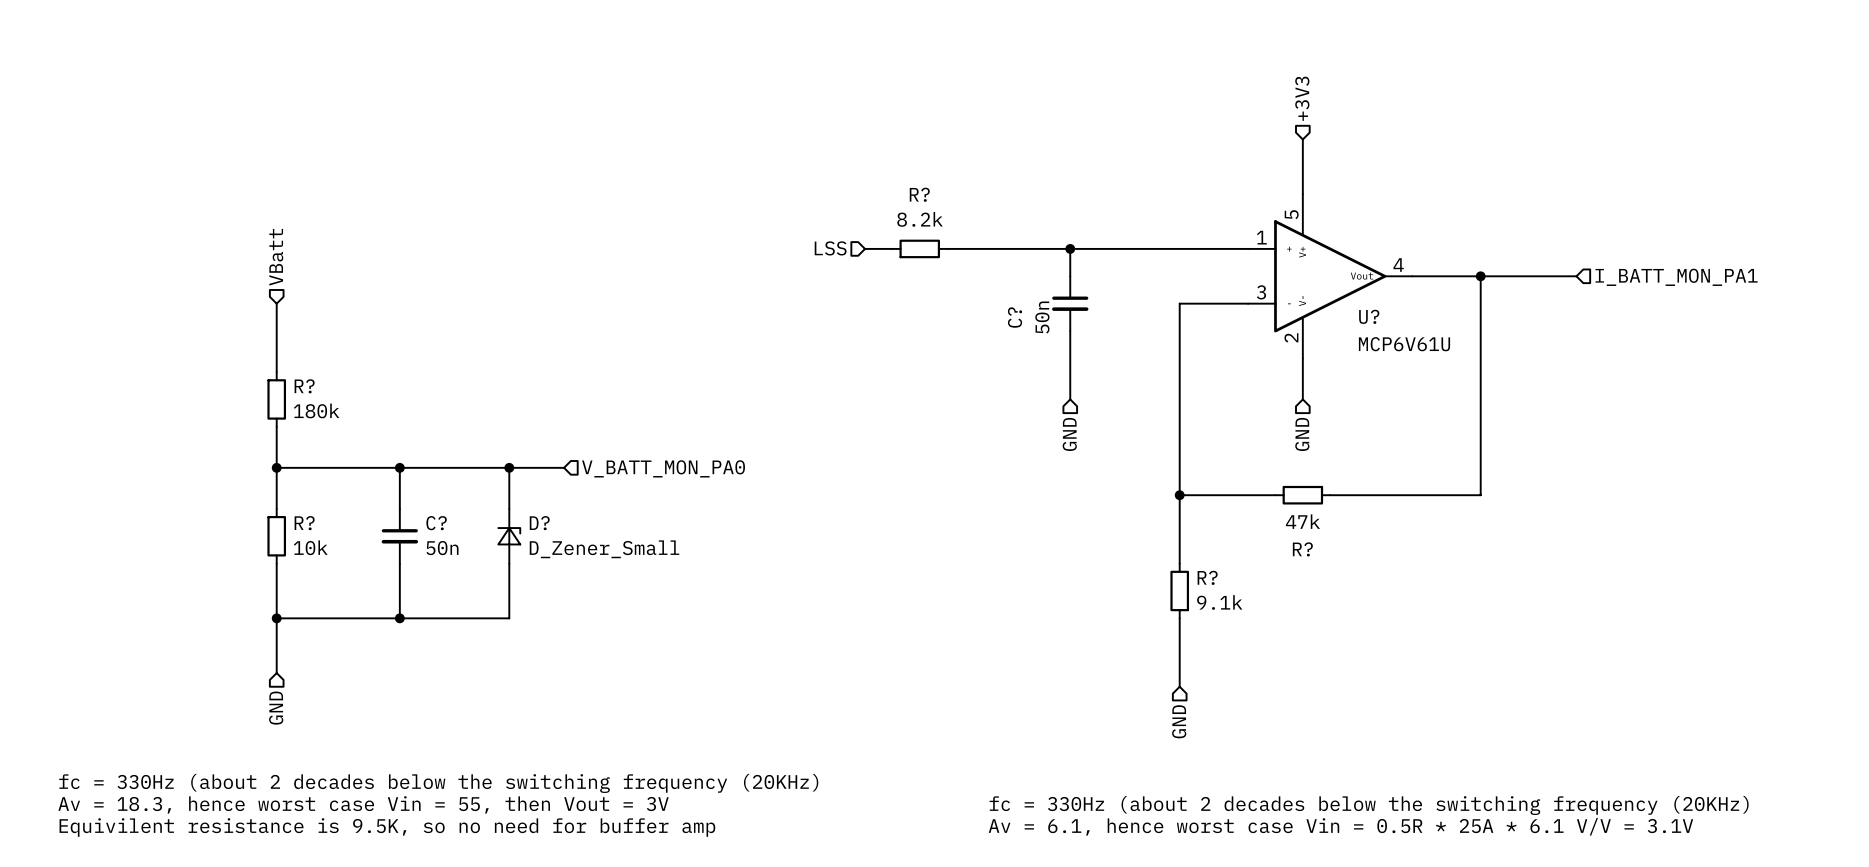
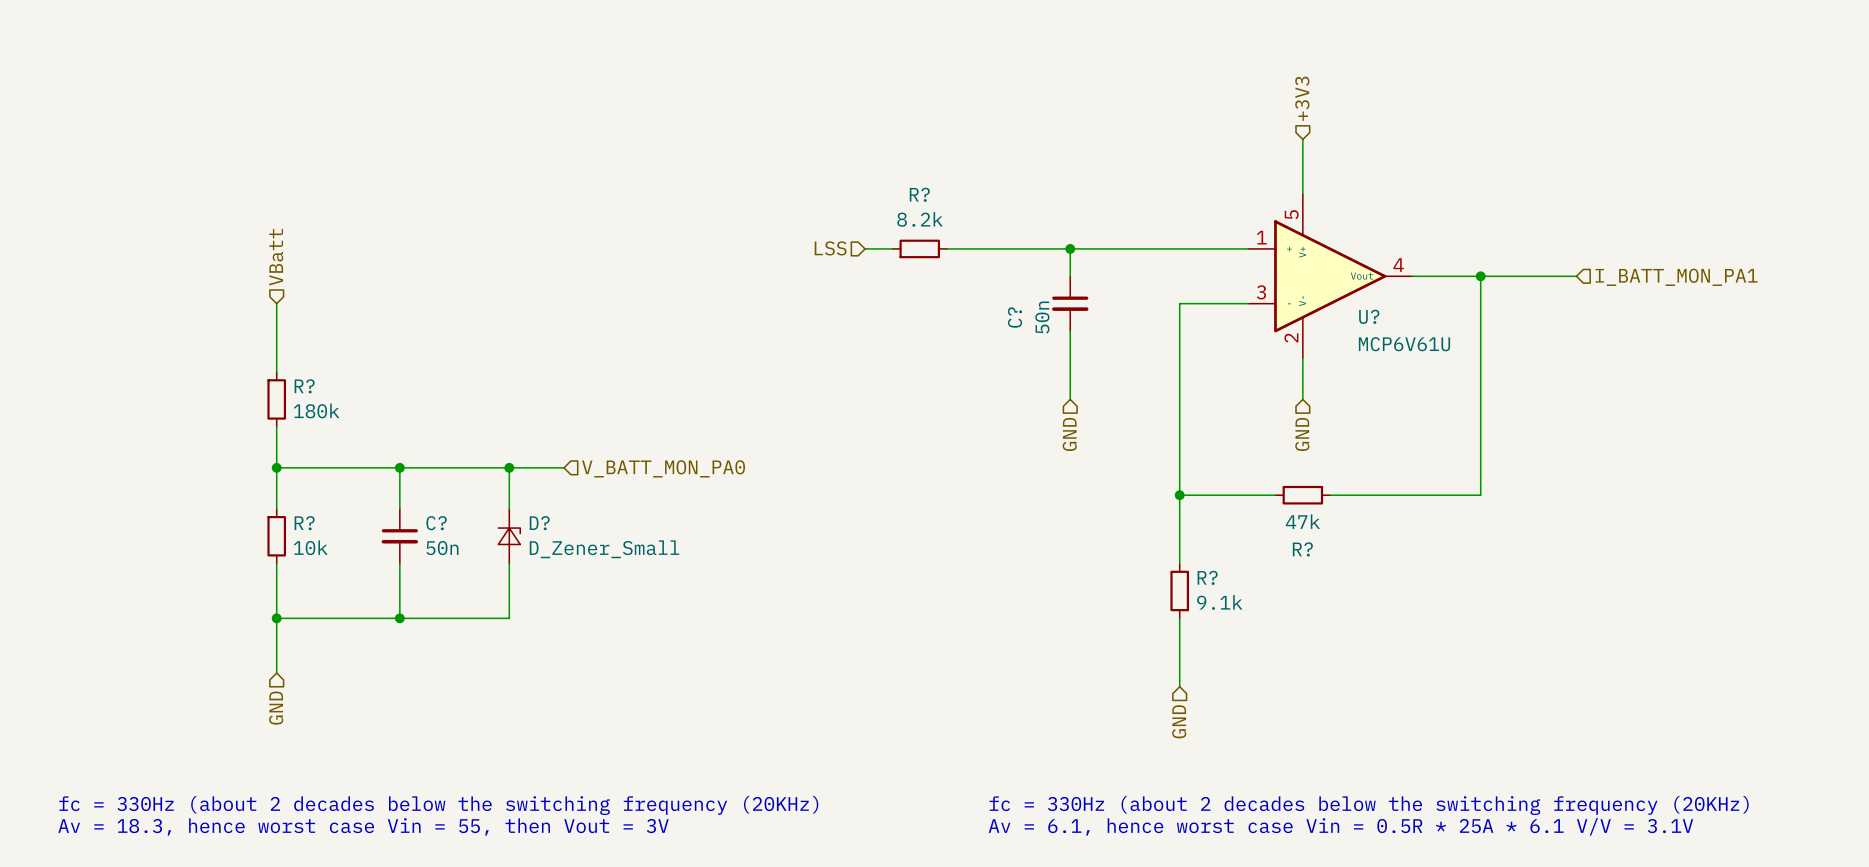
text: fc = 330Hz (about 2 decades below the switching frequency (20KHz) (438, 783) -> none
text: Av = 18.3, hence worst case Vin = 55, then Vout = 3V (363, 804) -> fc = 330Hz (about 2 decades below the switching frequency (20KHz) (438, 805)
text: Equivilent resistance is 9.5K, so no need for buffer amp (387, 827) -> Av = 18.3, hence worst case Vin = 55, then Vout = 3V (363, 826)

